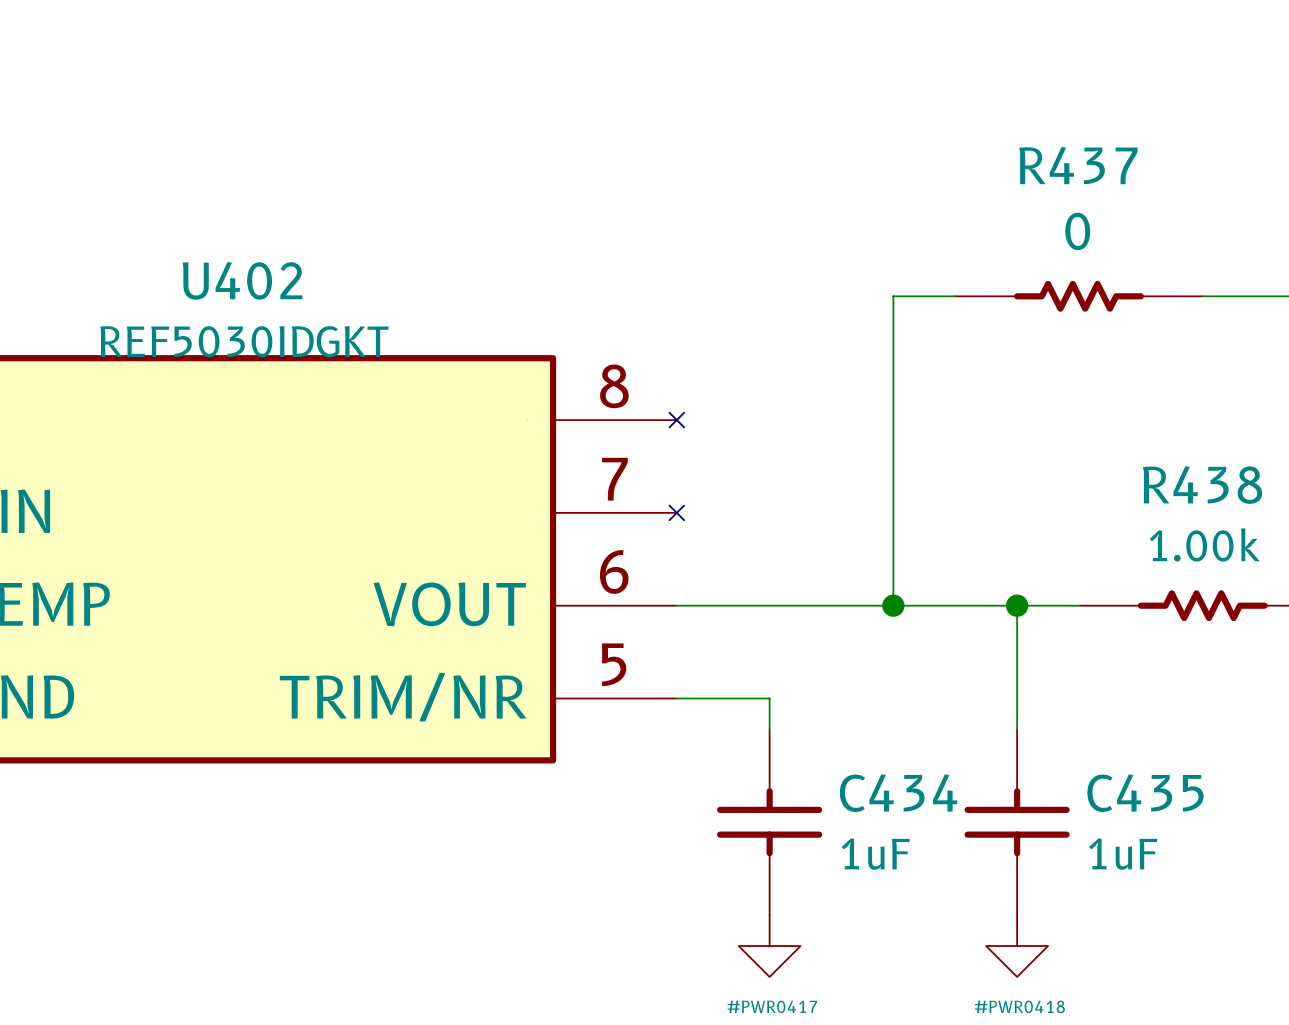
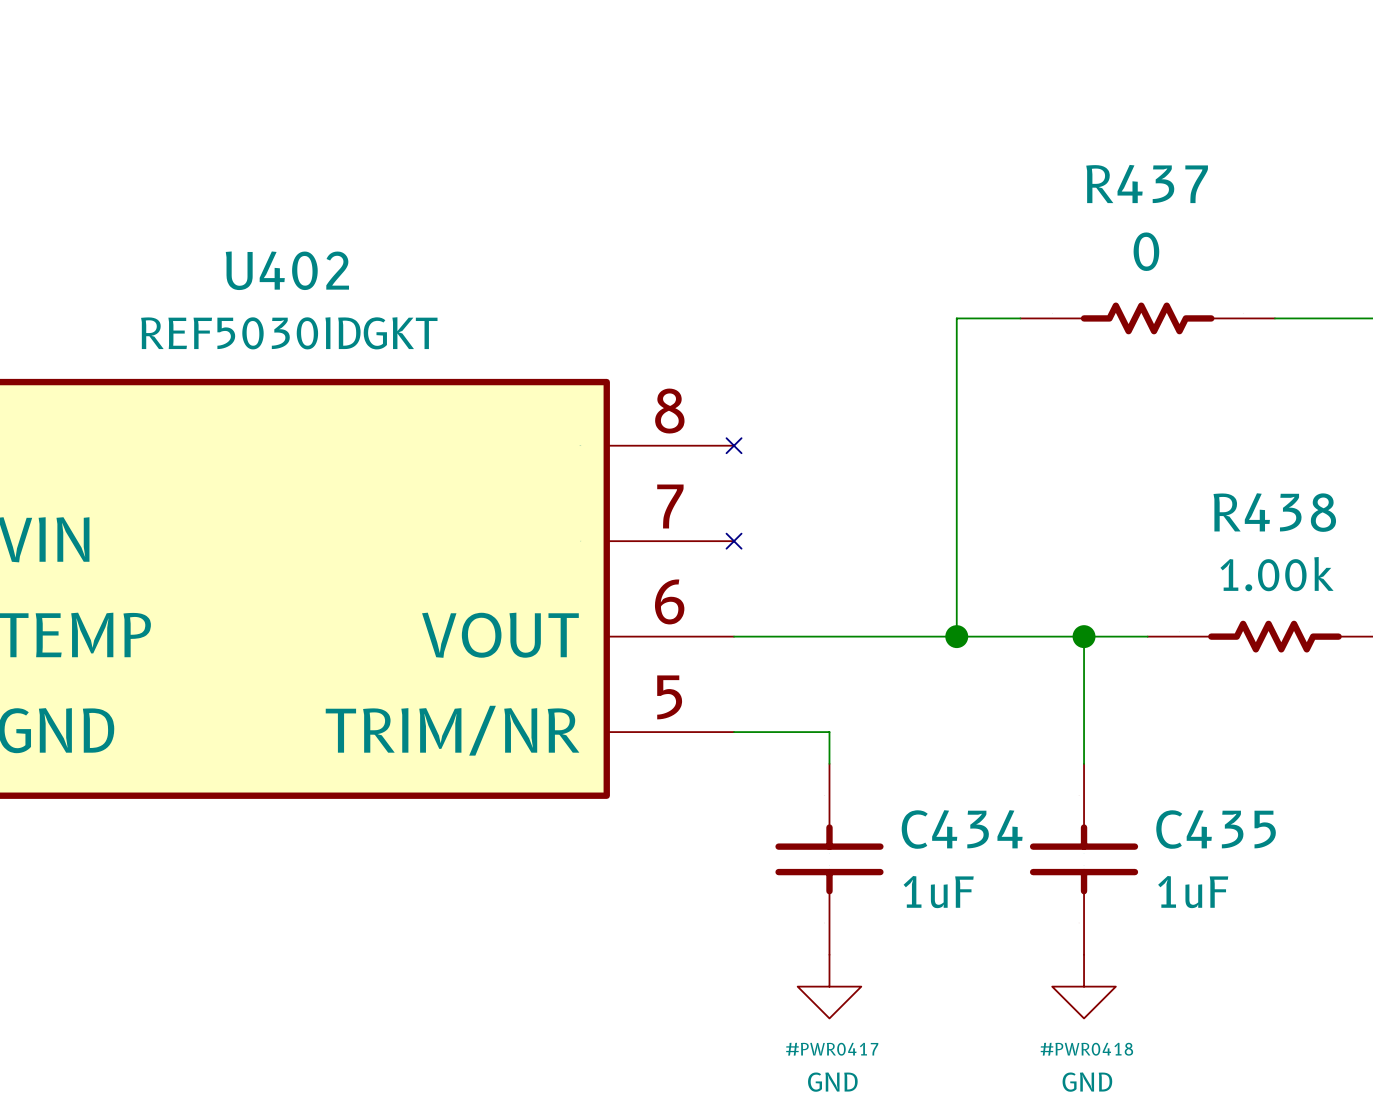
U402 name position: U402 (242, 280) -> U402 (287, 270)
U402 value position: REF5030IDGKT (244, 341) -> REF5030IDGKT (289, 333)

